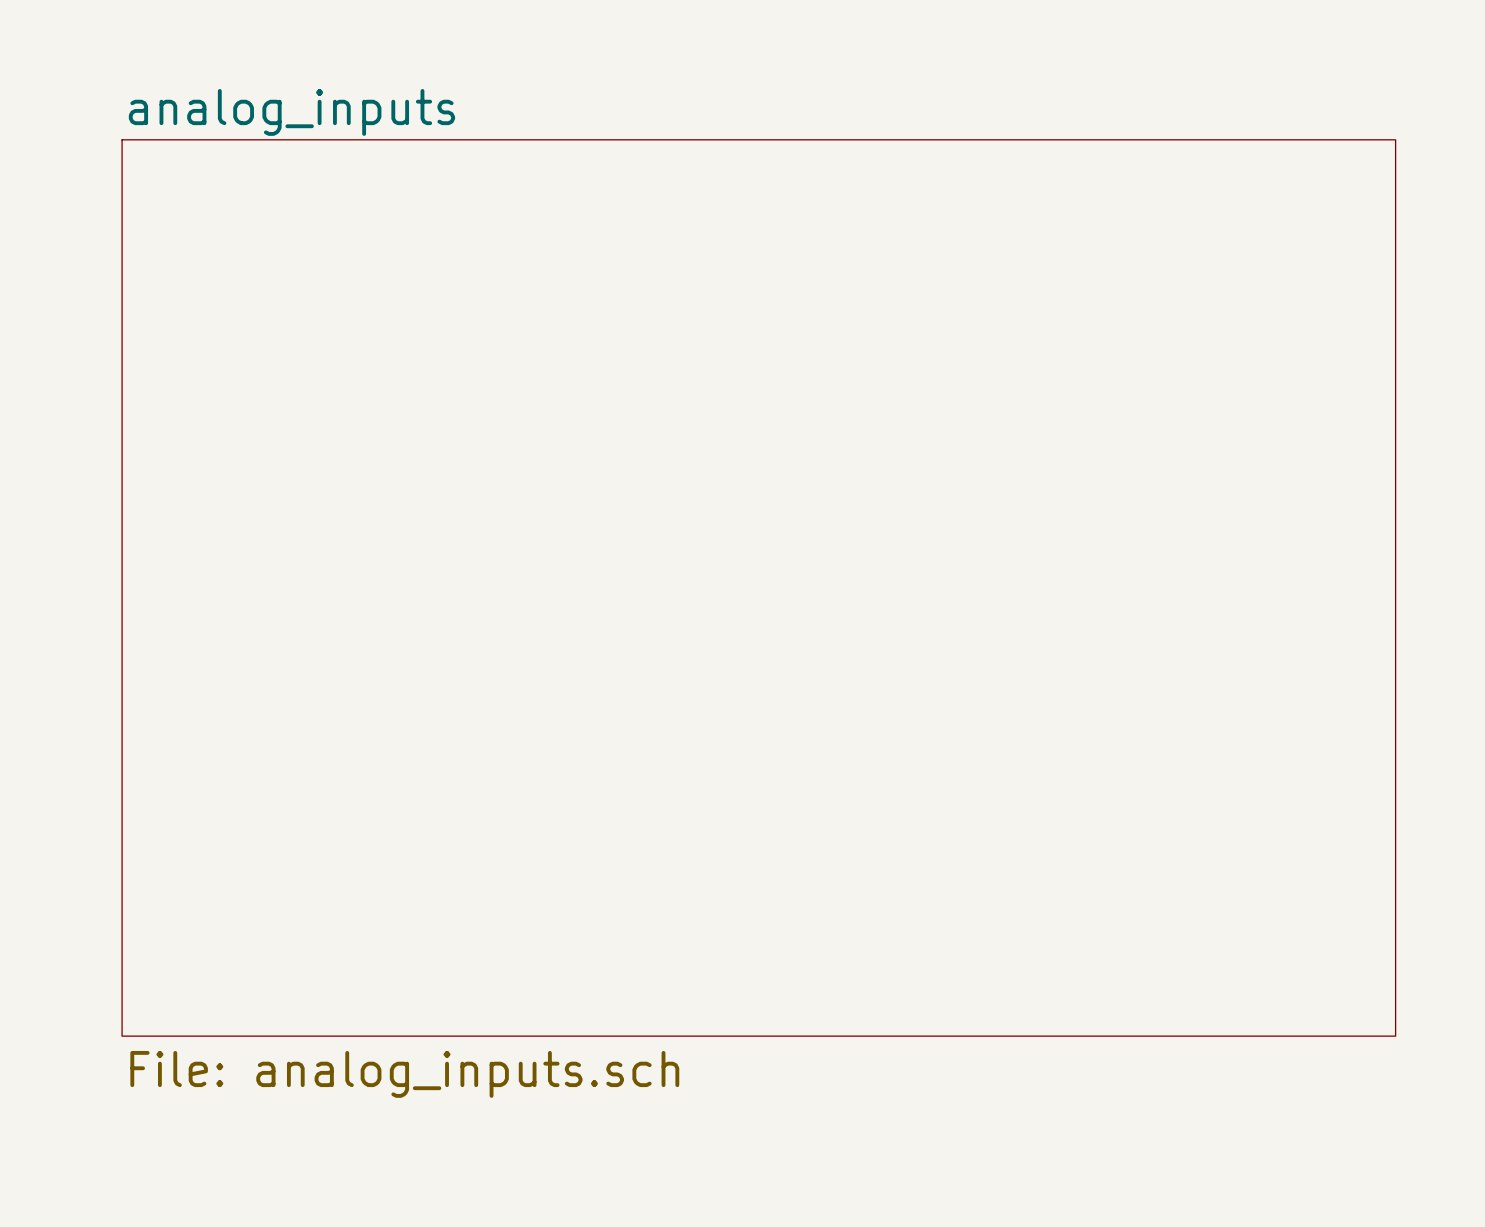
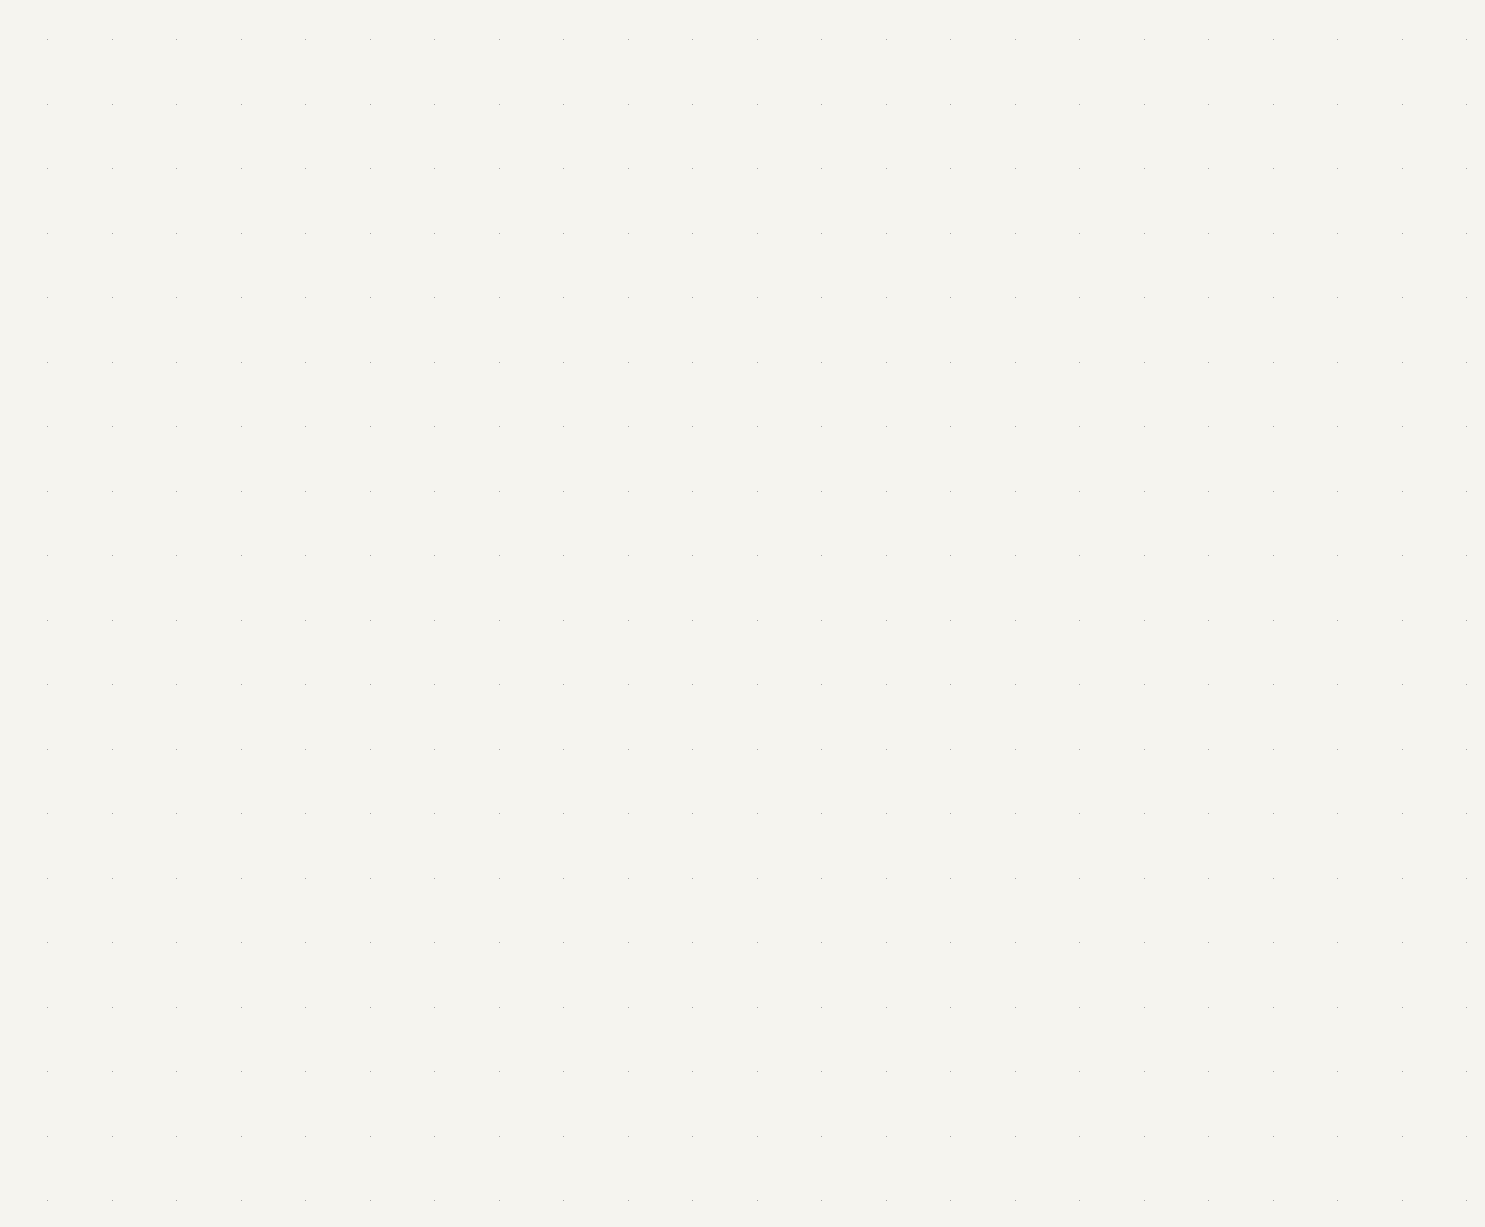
sheet analog_inputs: File: analog_inputs.sch (758, 587) -> none

